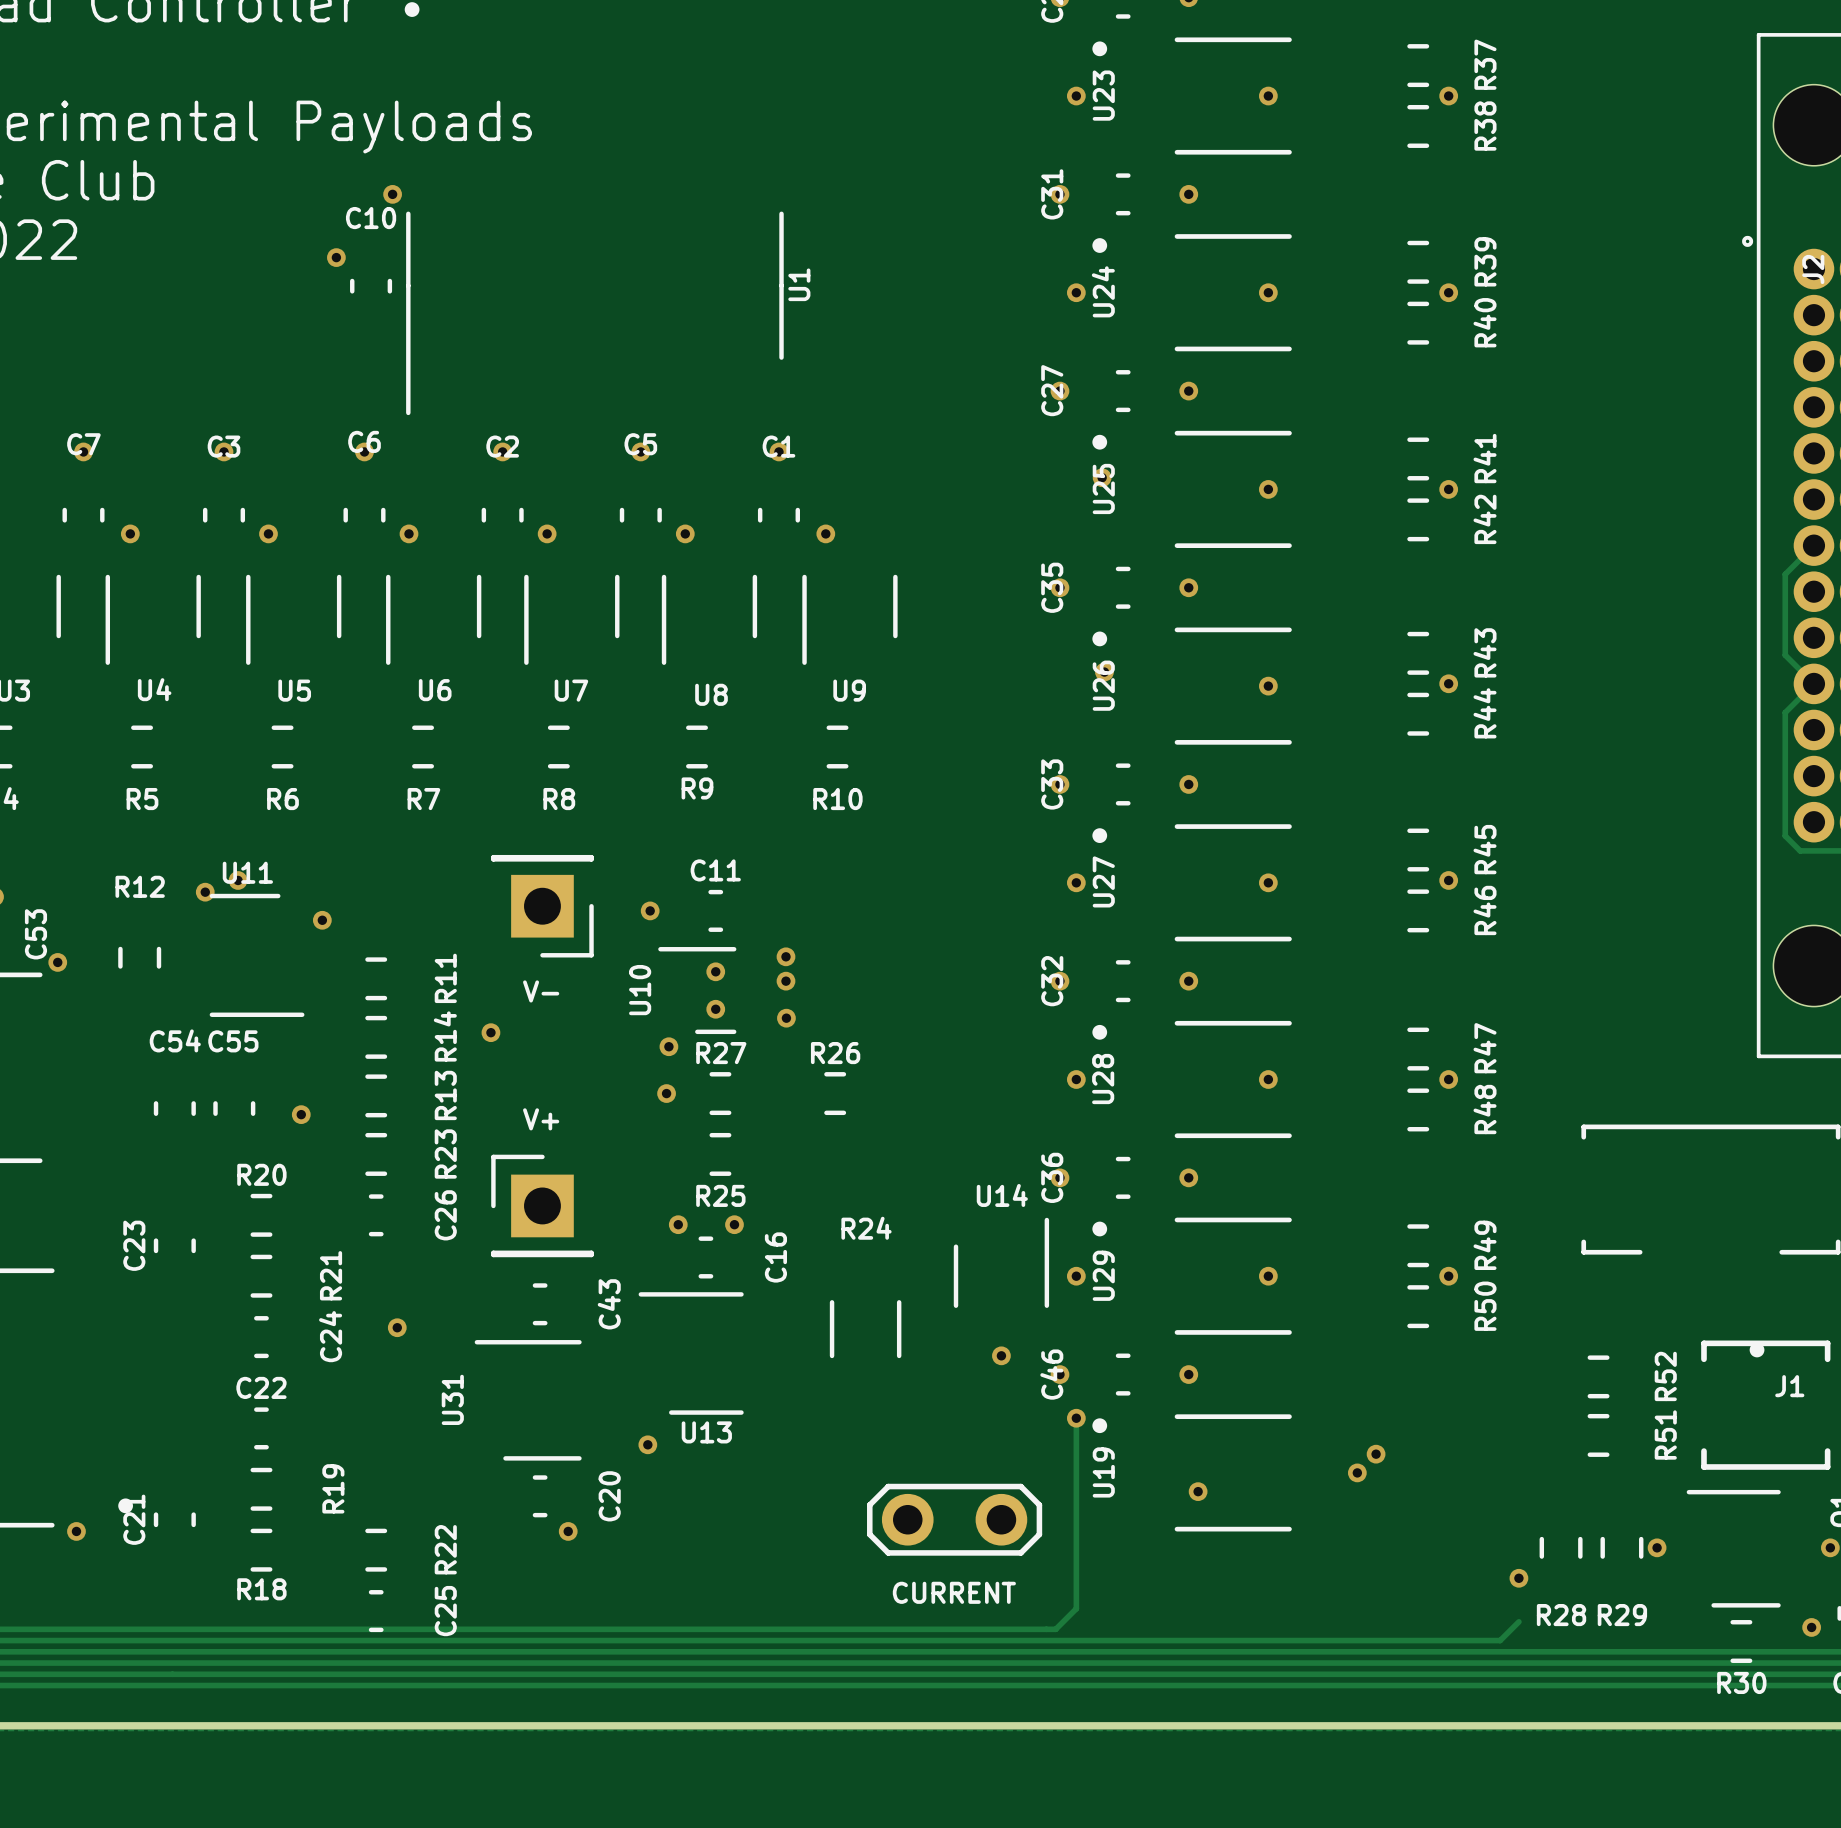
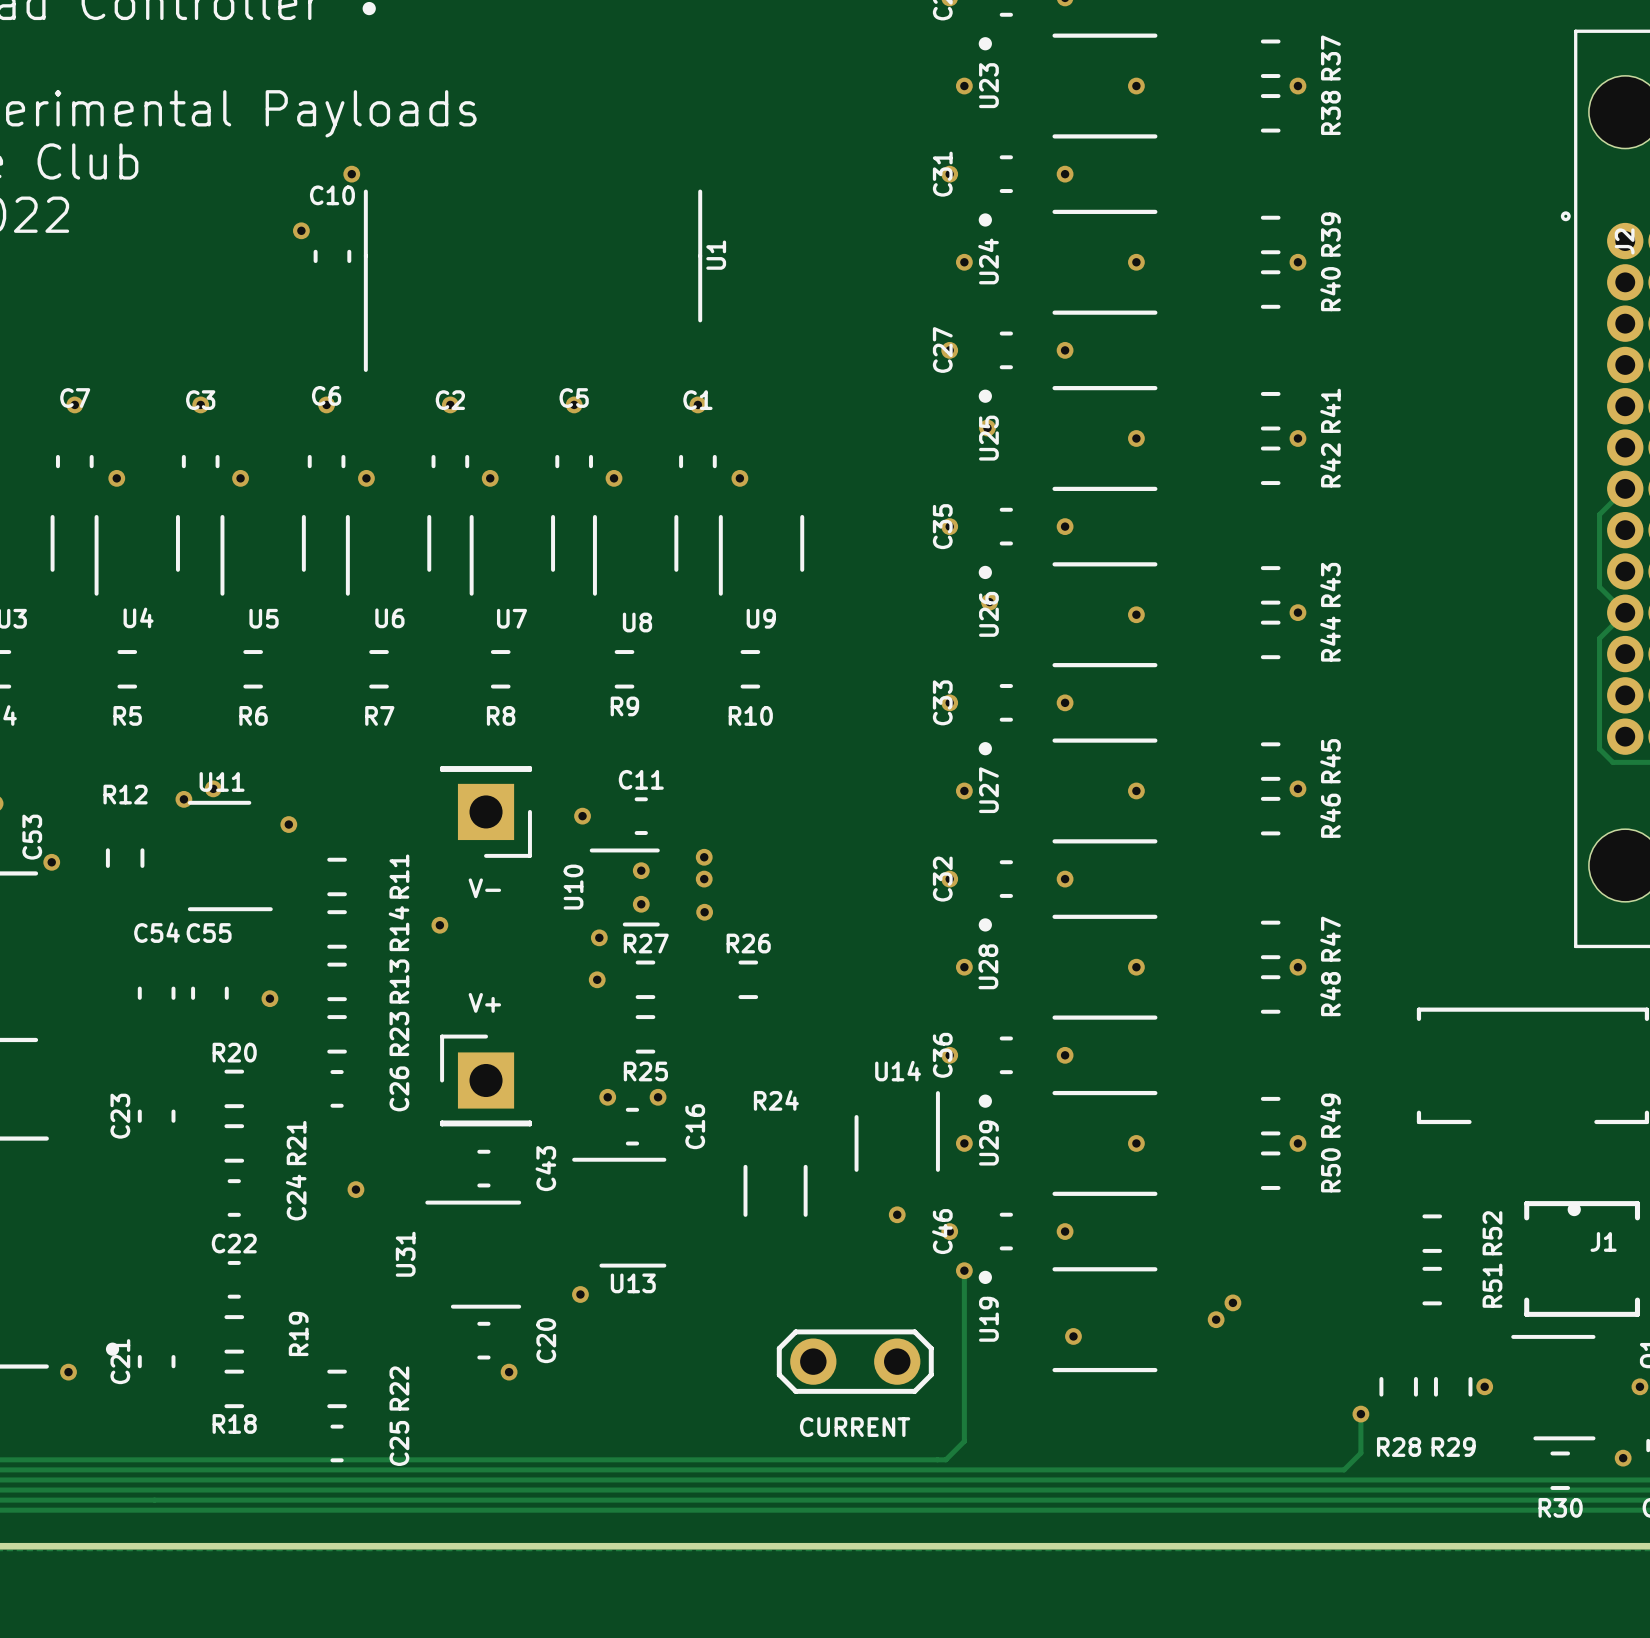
track: none -> (1360, 1414) (1360, 1453)

